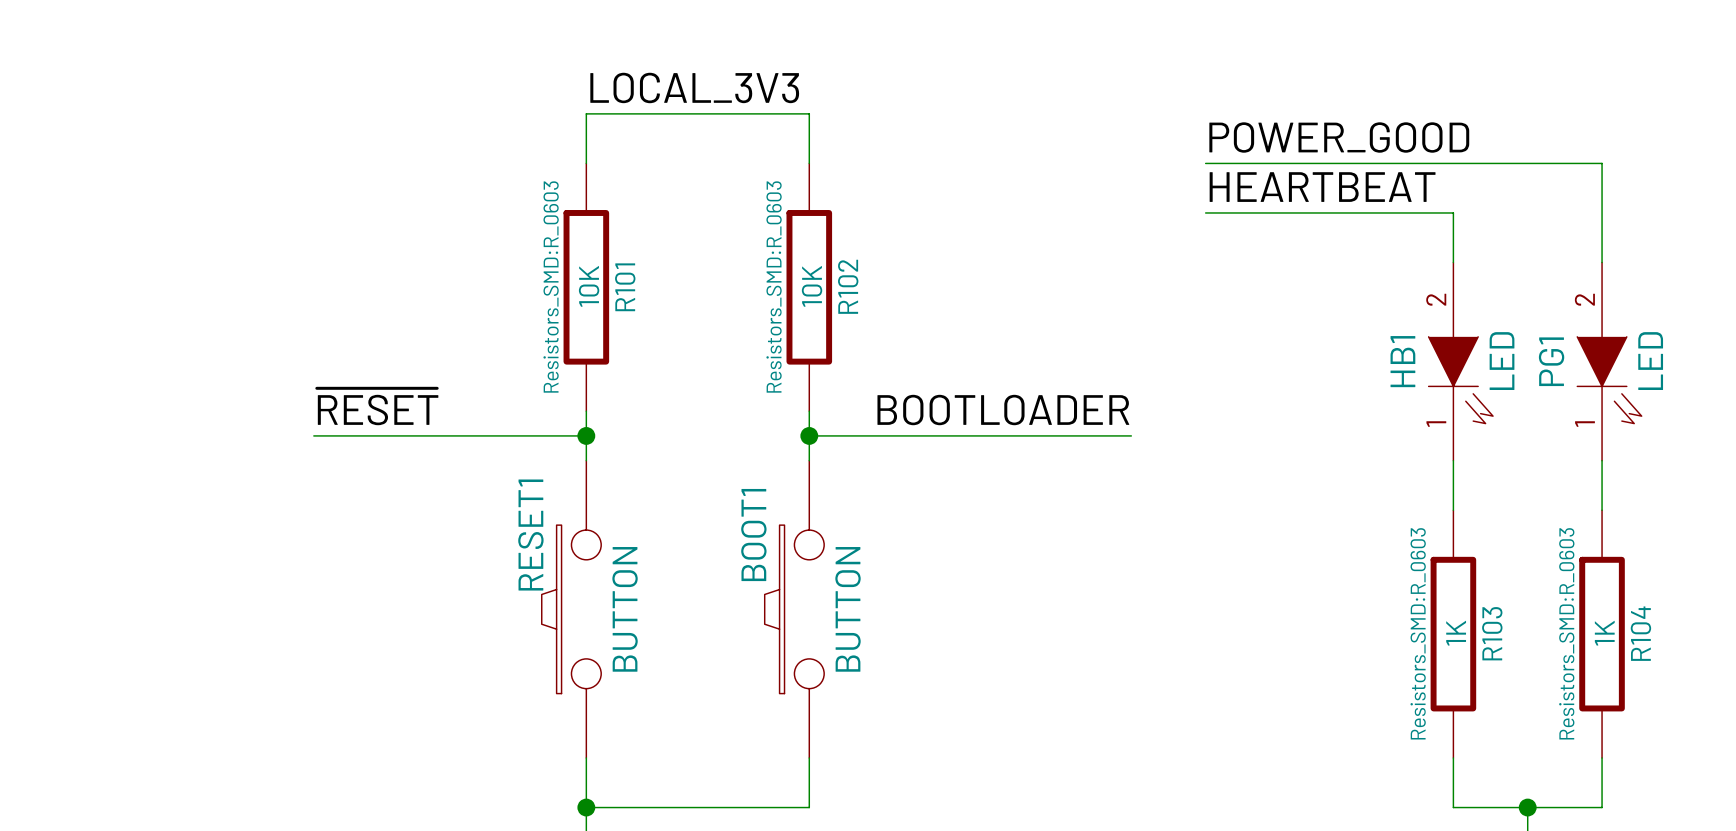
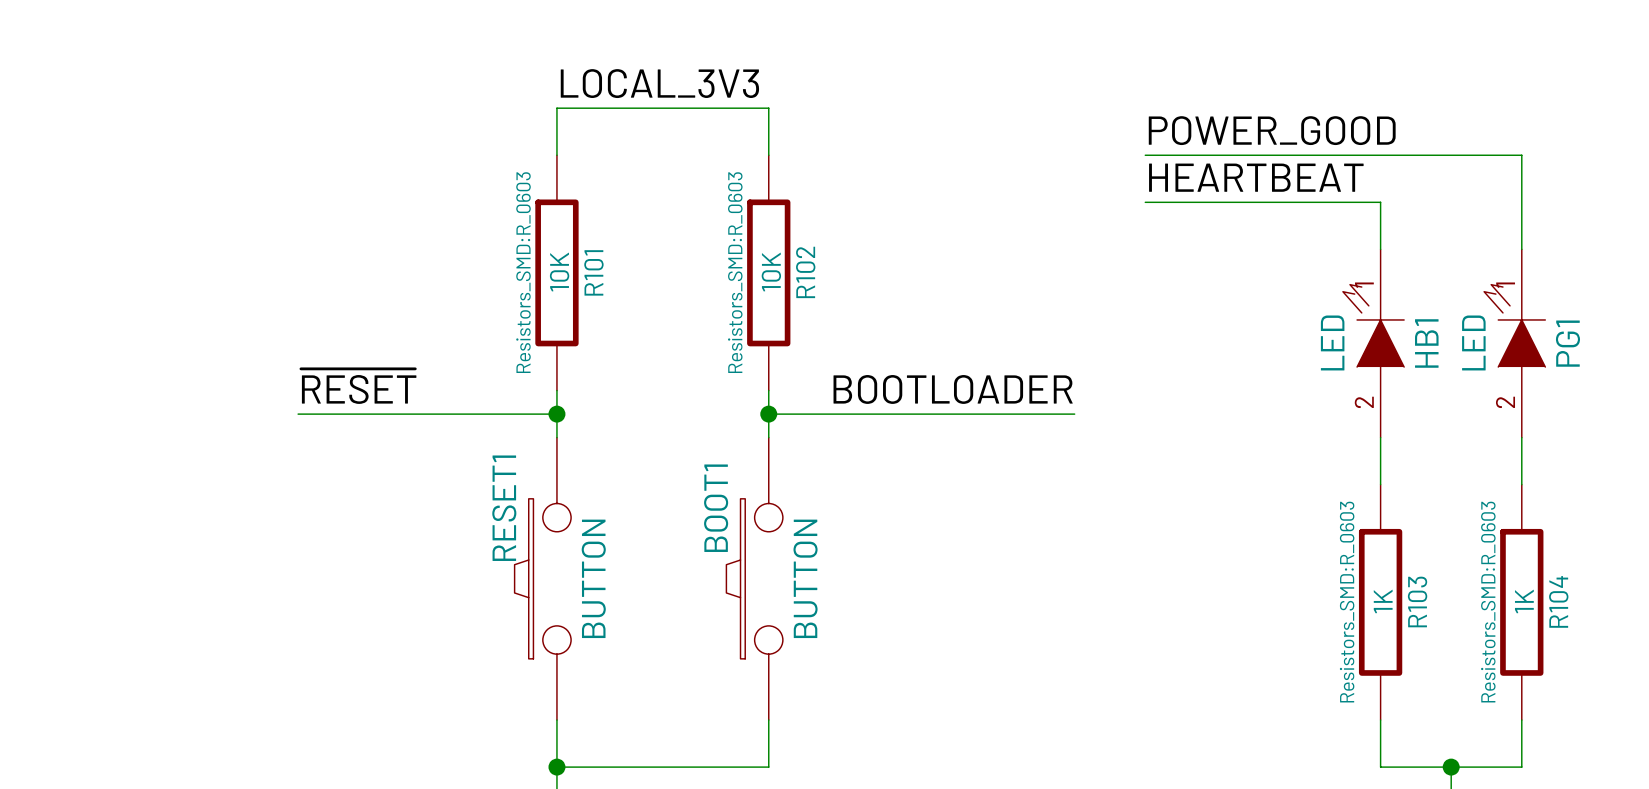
HB1 rotation: 0° (1460, 380) -> 180° (1373, 325)
PG1 rotation: 0° (1609, 380) -> 180° (1514, 325)

